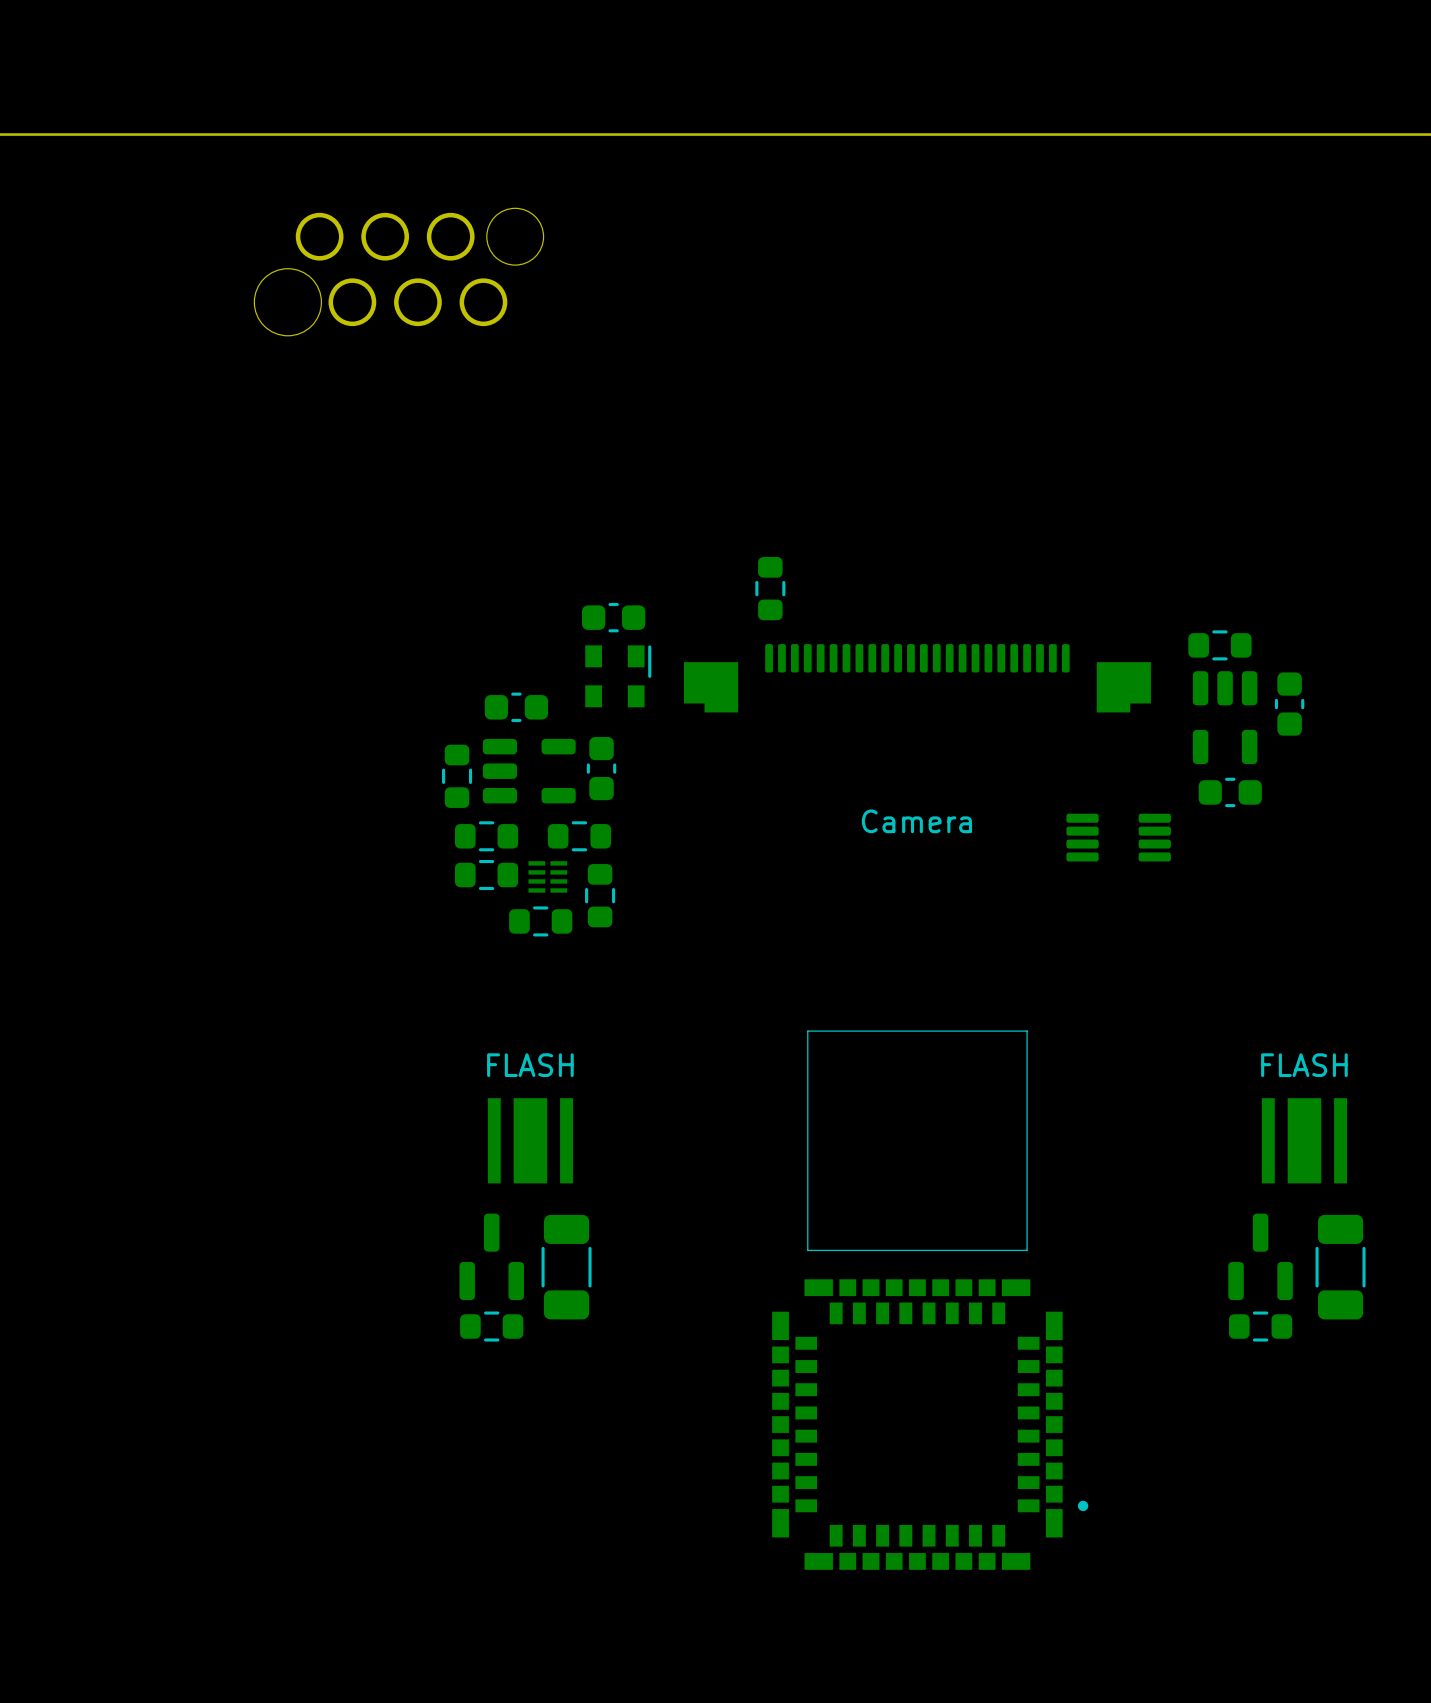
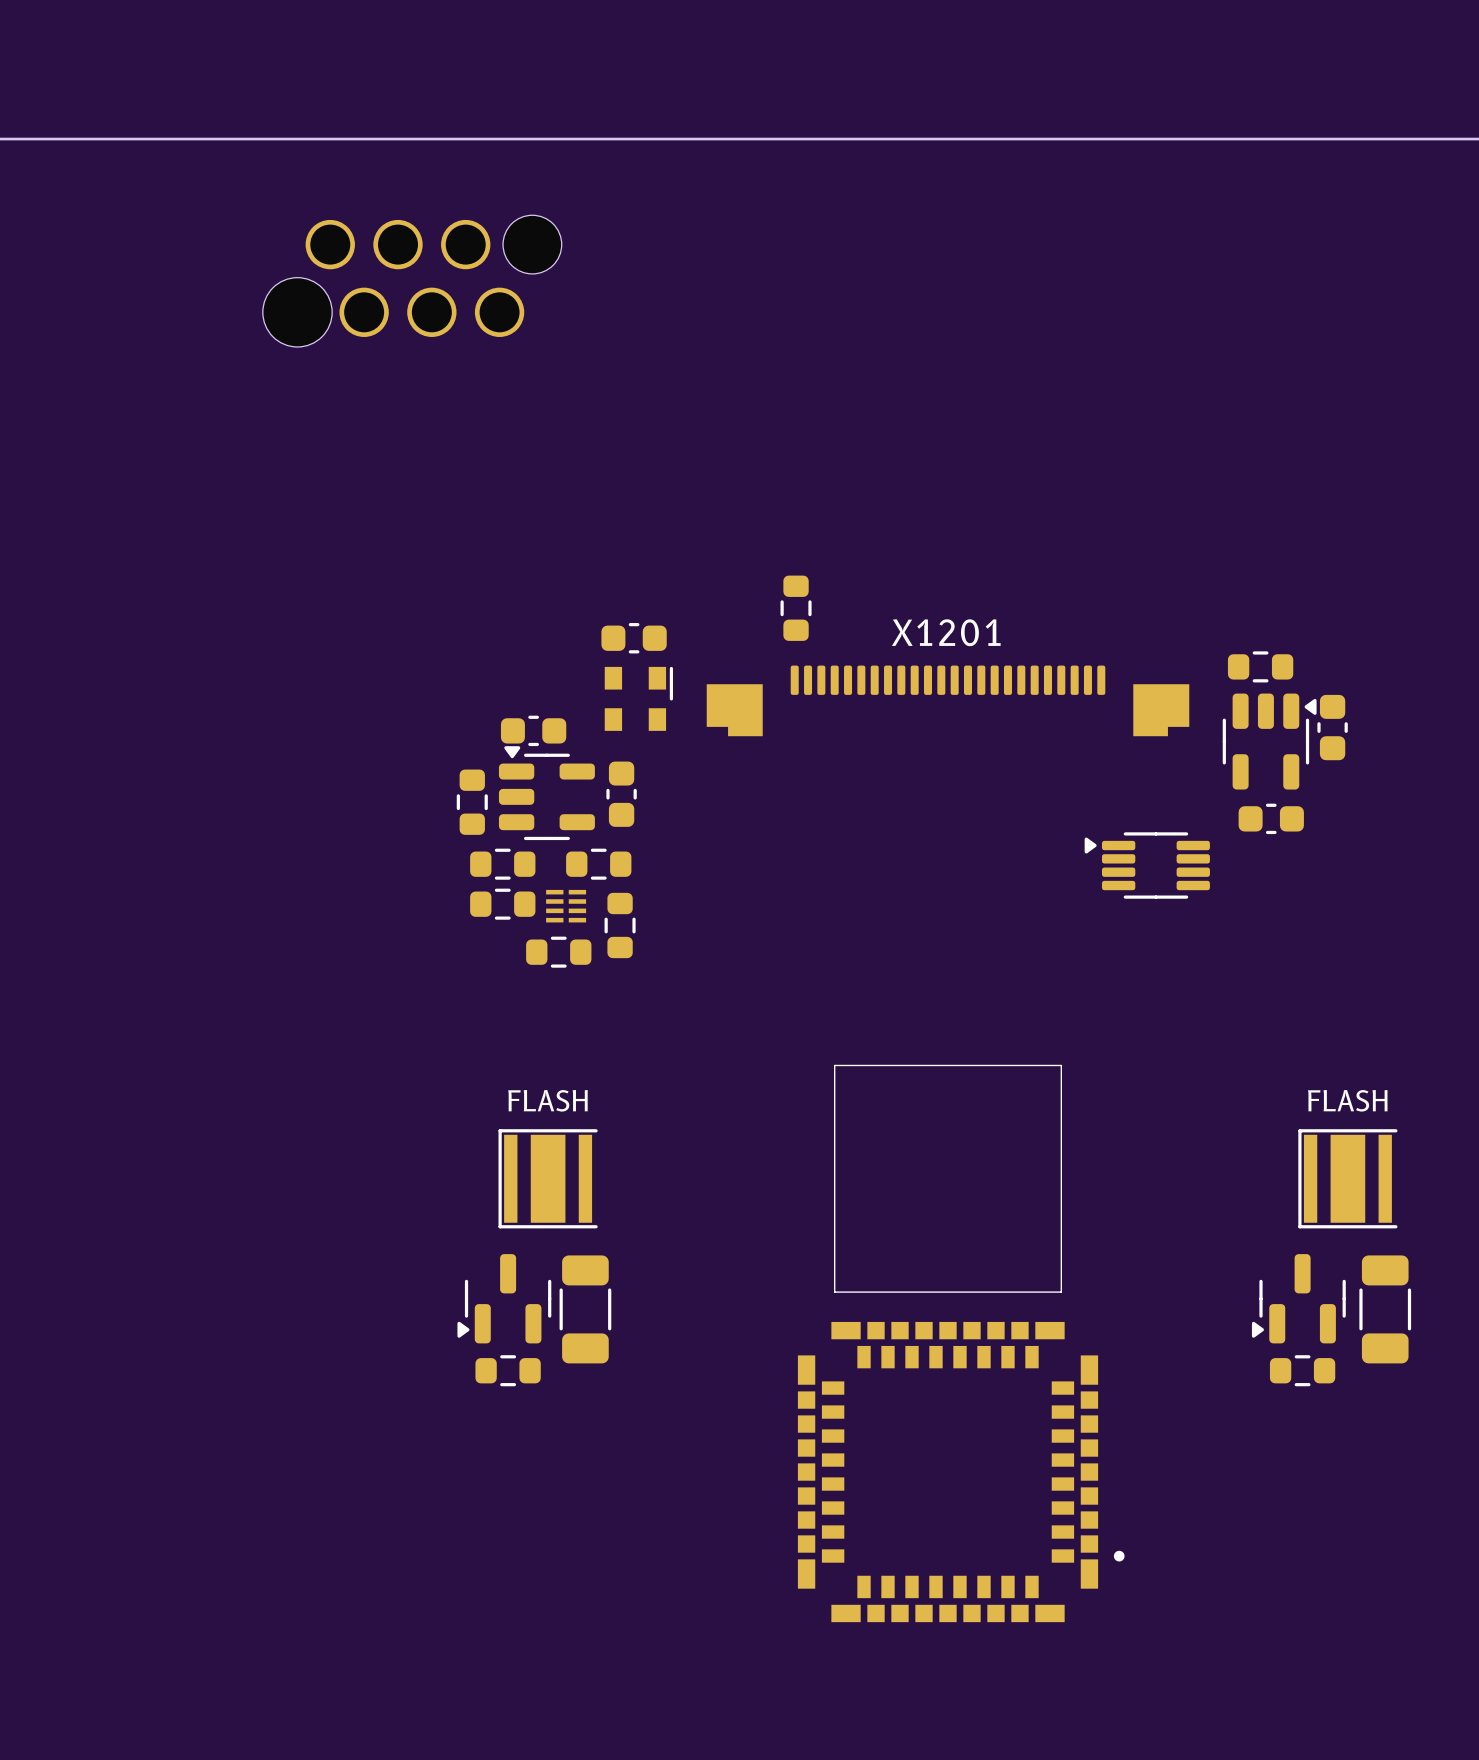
X1201 name: none -> X1201 (946, 632)
part footprint: [1192, 671, 1258, 765] -> [1222, 693, 1317, 790]
part footprint: [482, 738, 576, 804] -> [498, 746, 595, 841]
part footprint: [1066, 813, 1171, 862] -> [1084, 832, 1210, 899]
X1201 value: Camera (916, 821) -> none
part footprint: [487, 1098, 573, 1184] -> [498, 1129, 598, 1229]
part footprint: [1261, 1098, 1348, 1184] -> [1298, 1129, 1398, 1229]
part footprint: [459, 1213, 524, 1301] -> [457, 1254, 552, 1344]
part footprint: [1228, 1213, 1293, 1301] -> [1251, 1254, 1346, 1344]

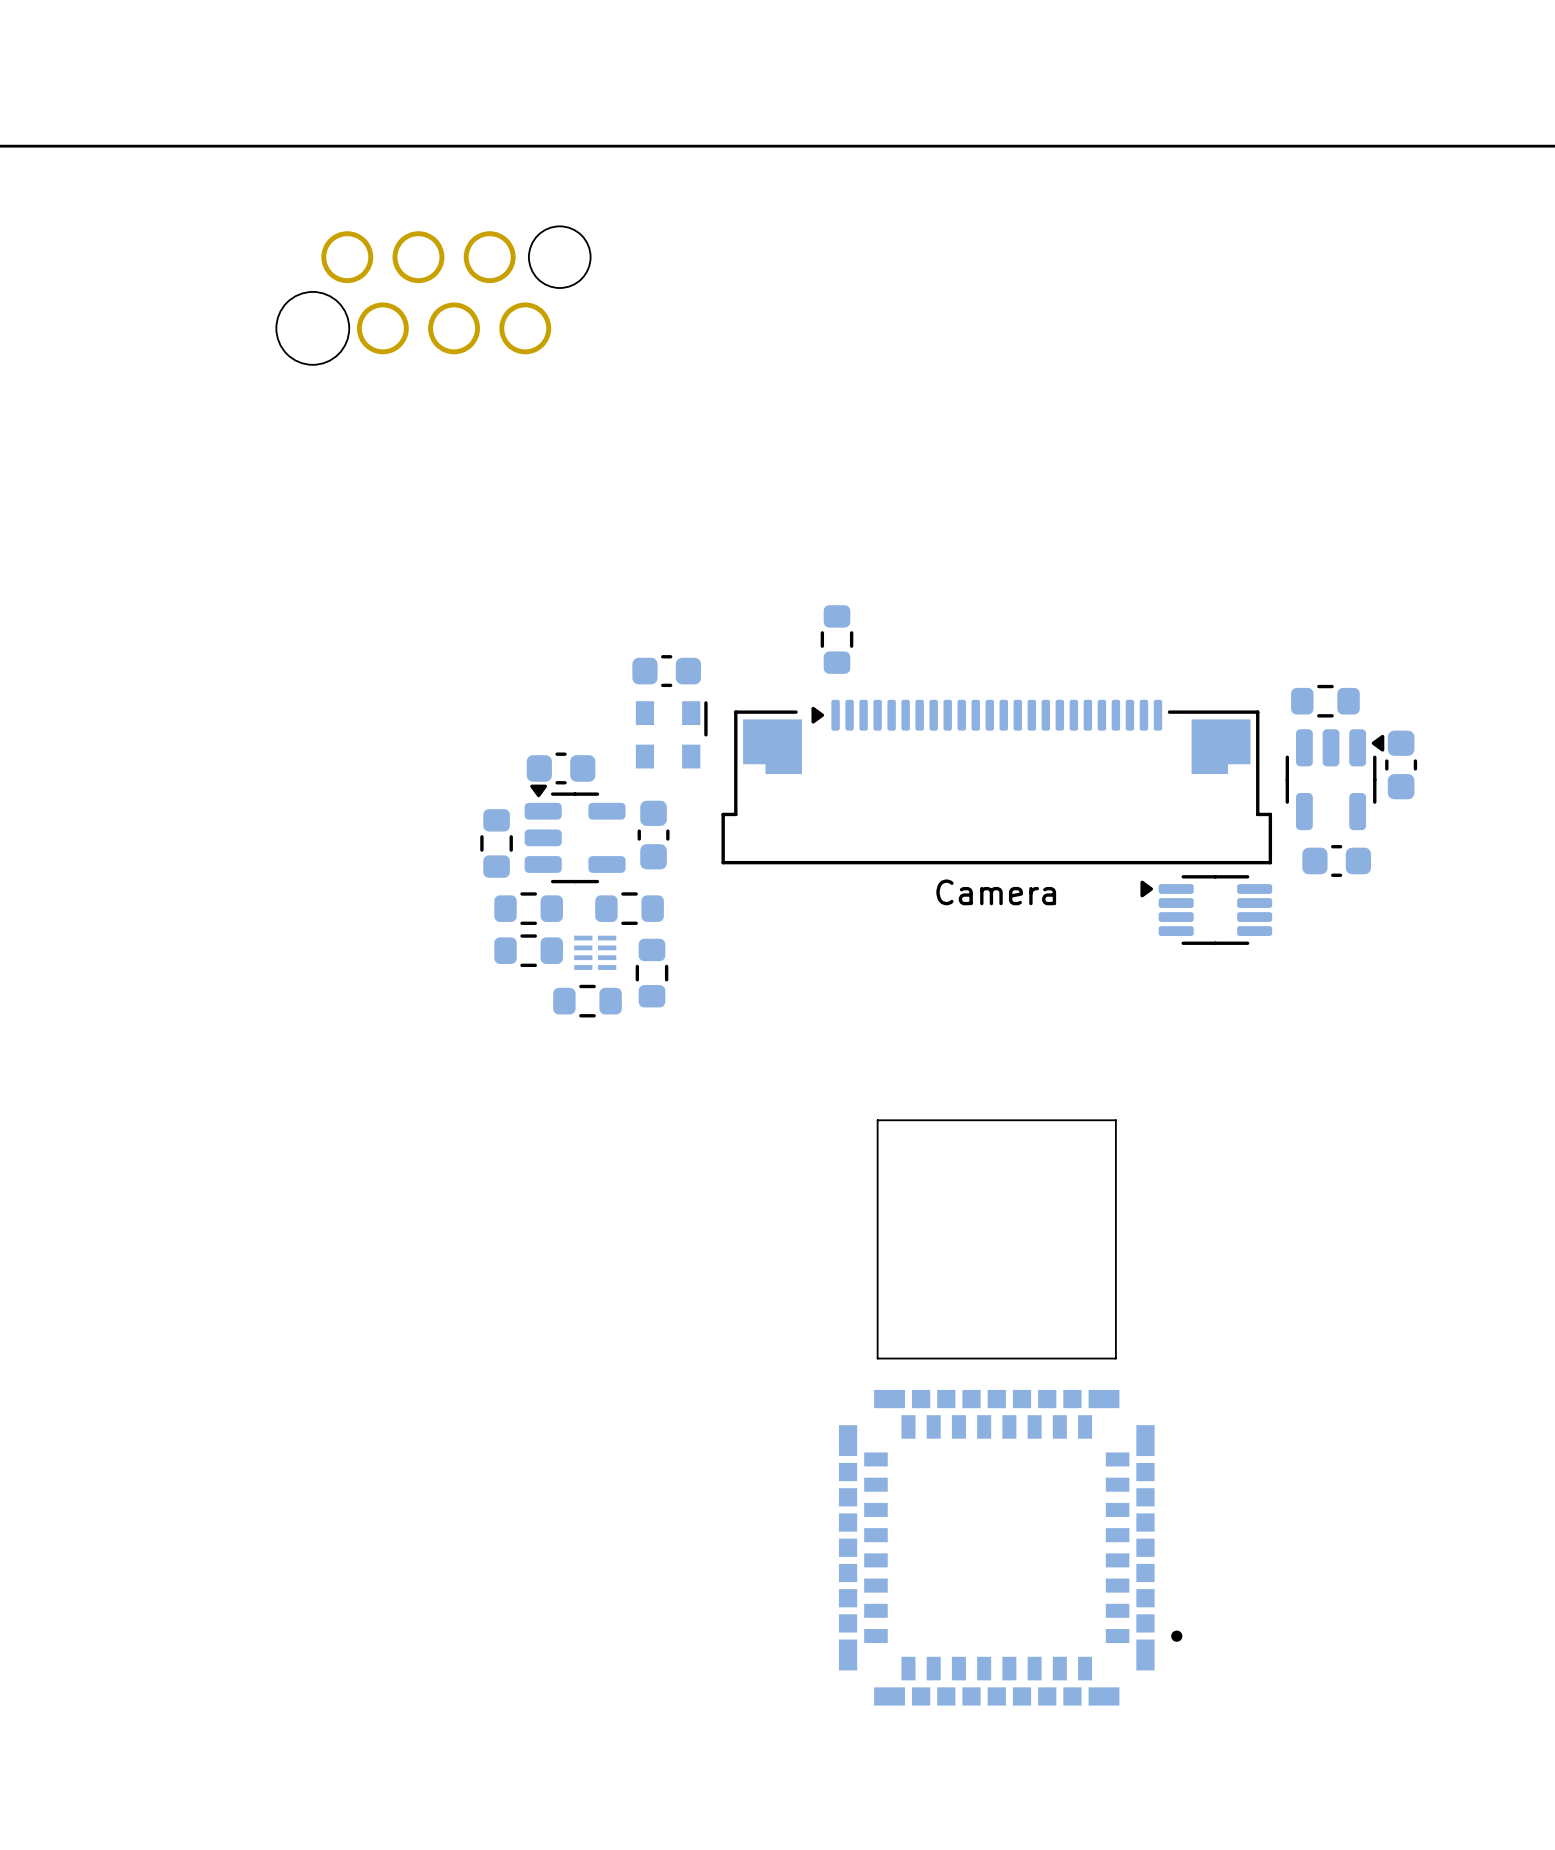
X1201: (948, 700) -> none
part: none -> Camera (996, 782)
part: FLASH (548, 1178) -> none
part: FLASH (1347, 1178) -> none
part: (504, 1298) -> none
part: (1298, 1298) -> none
part: (585, 1309) -> none
part: (1385, 1309) -> none
part: (508, 1370) -> none
part: (1302, 1370) -> none

